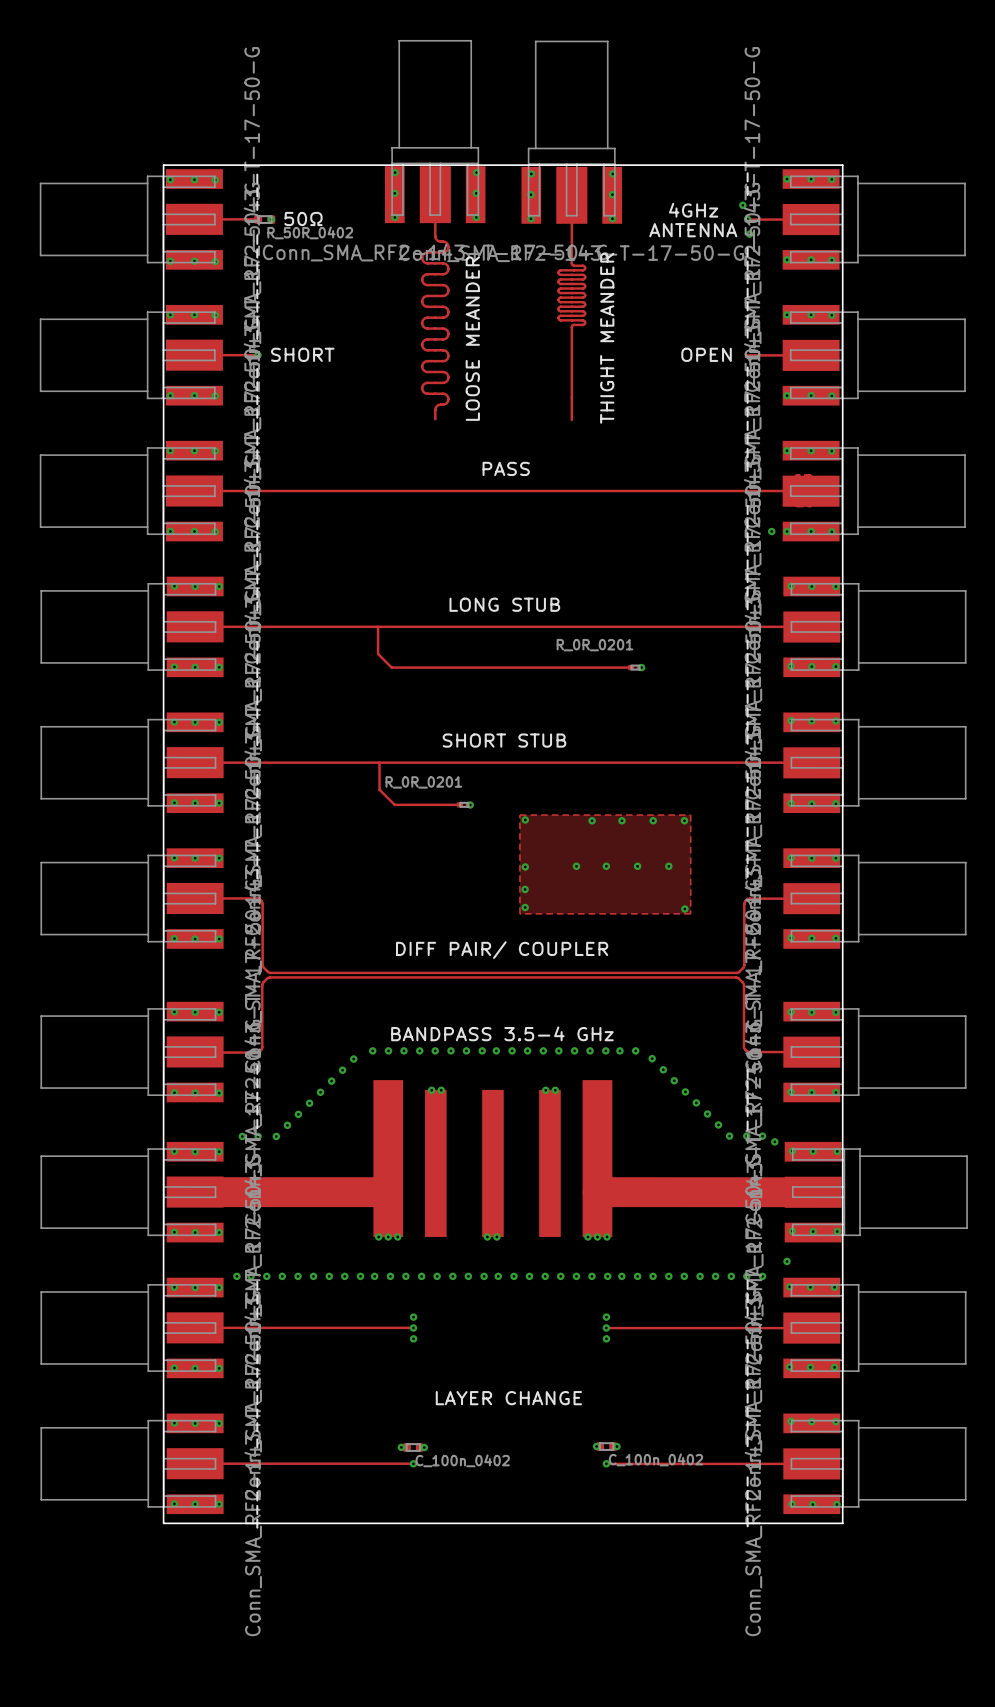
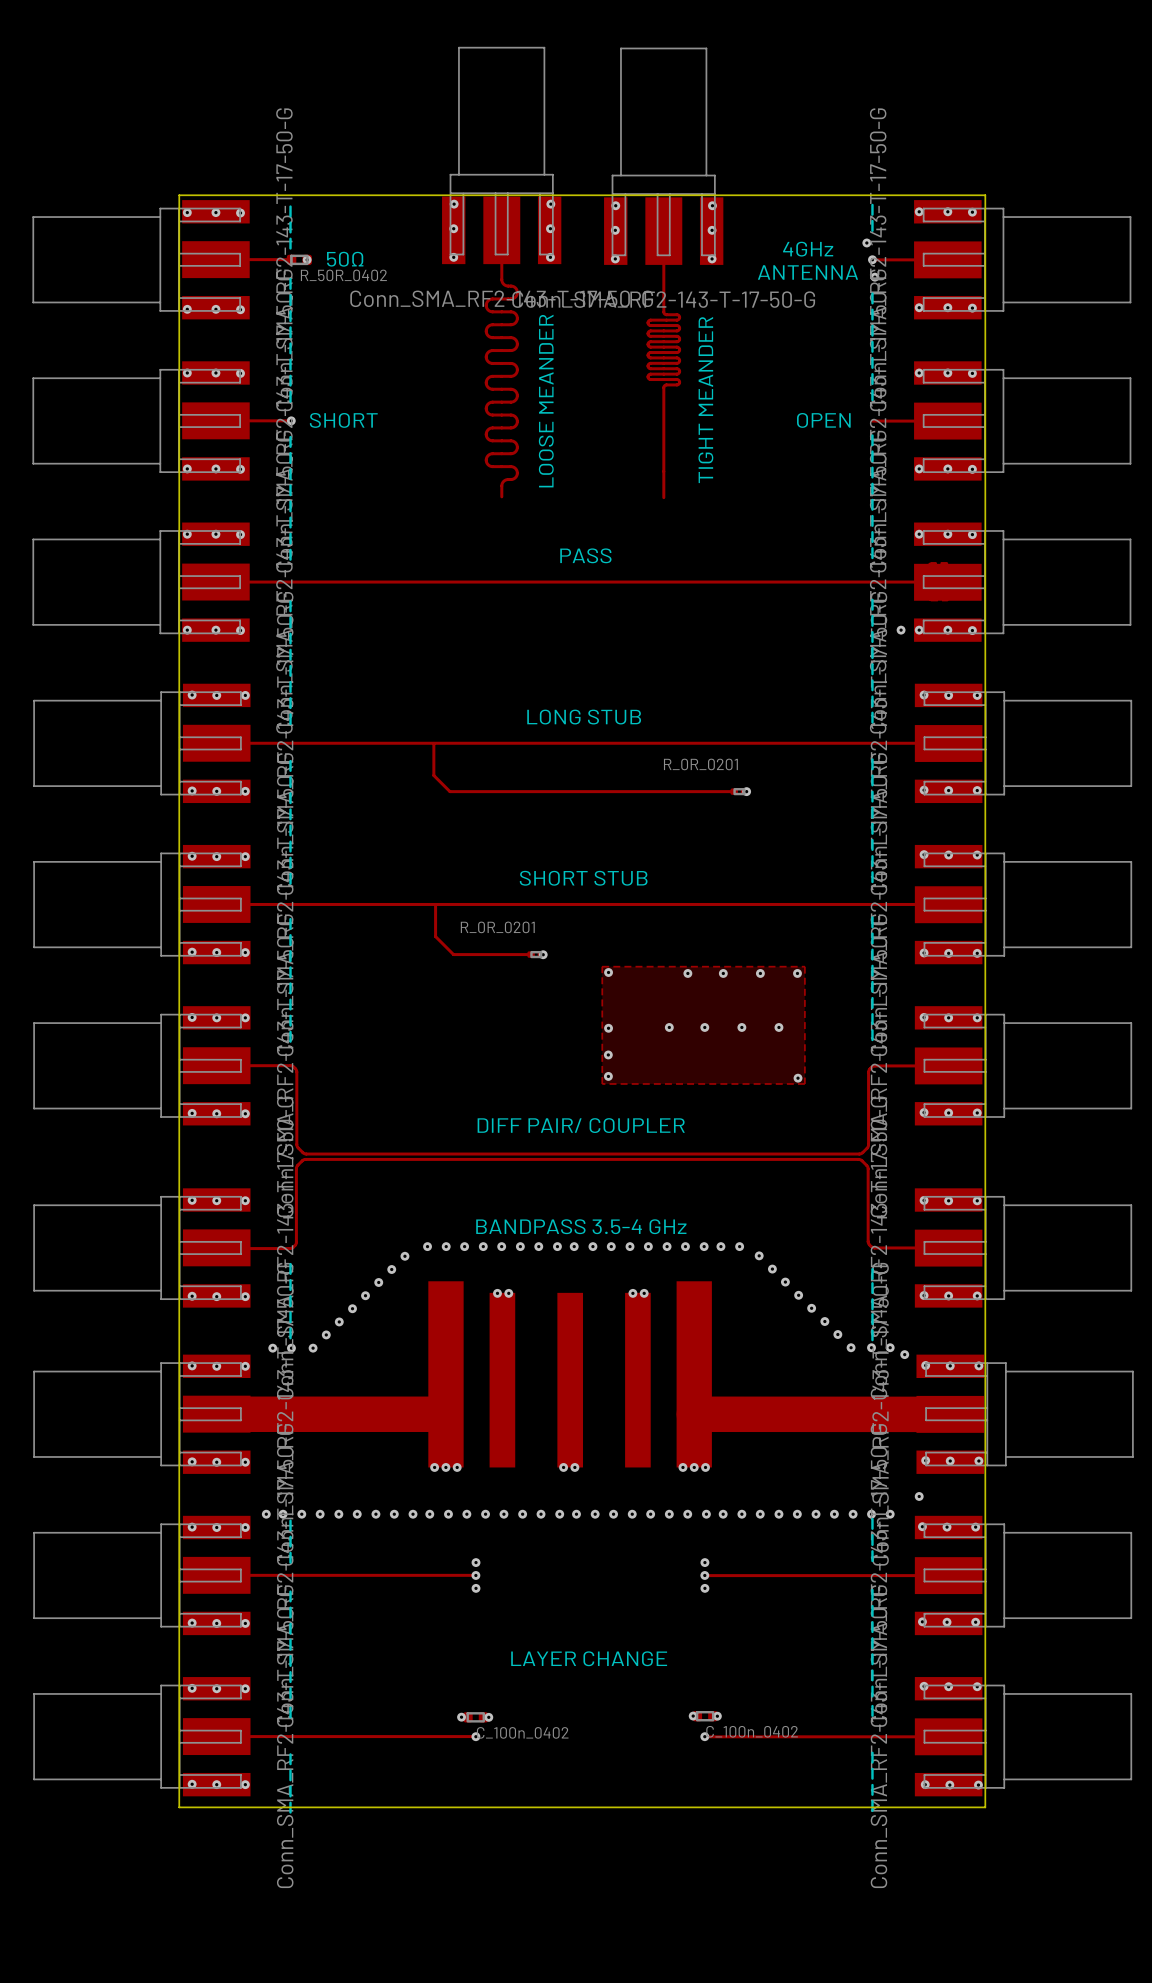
text: THIGHT MEANDER (607, 338) -> TIGHT MEANDER (705, 400)

